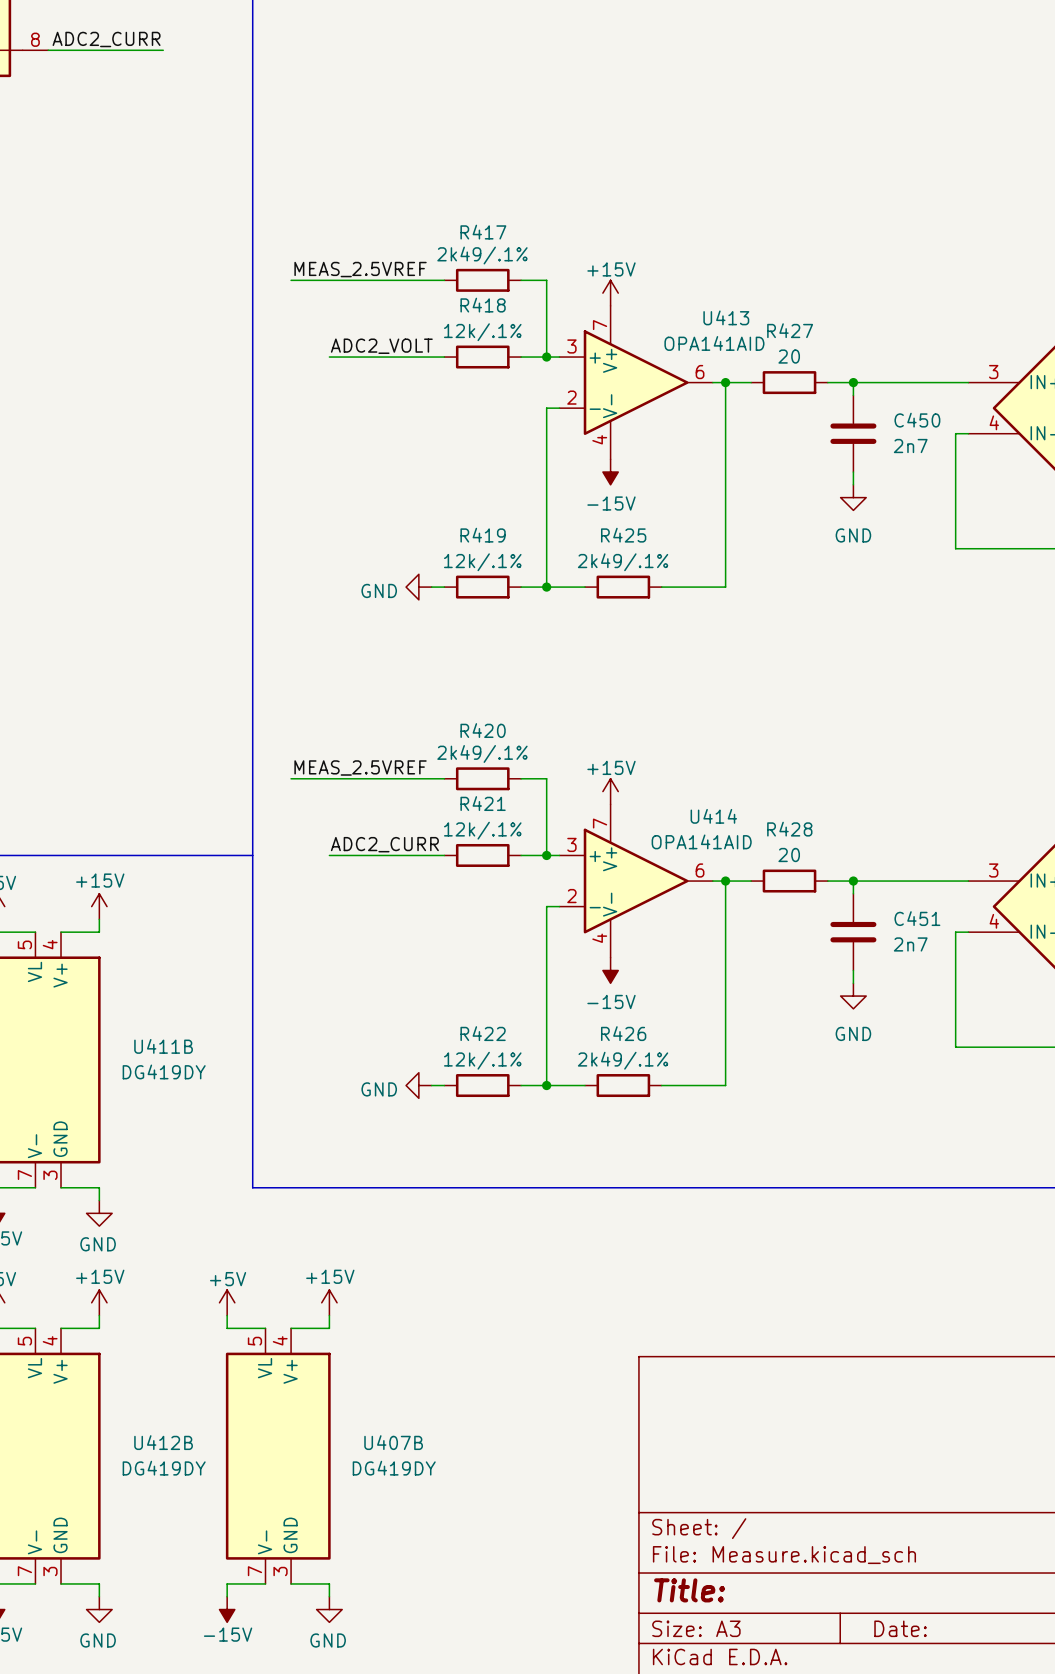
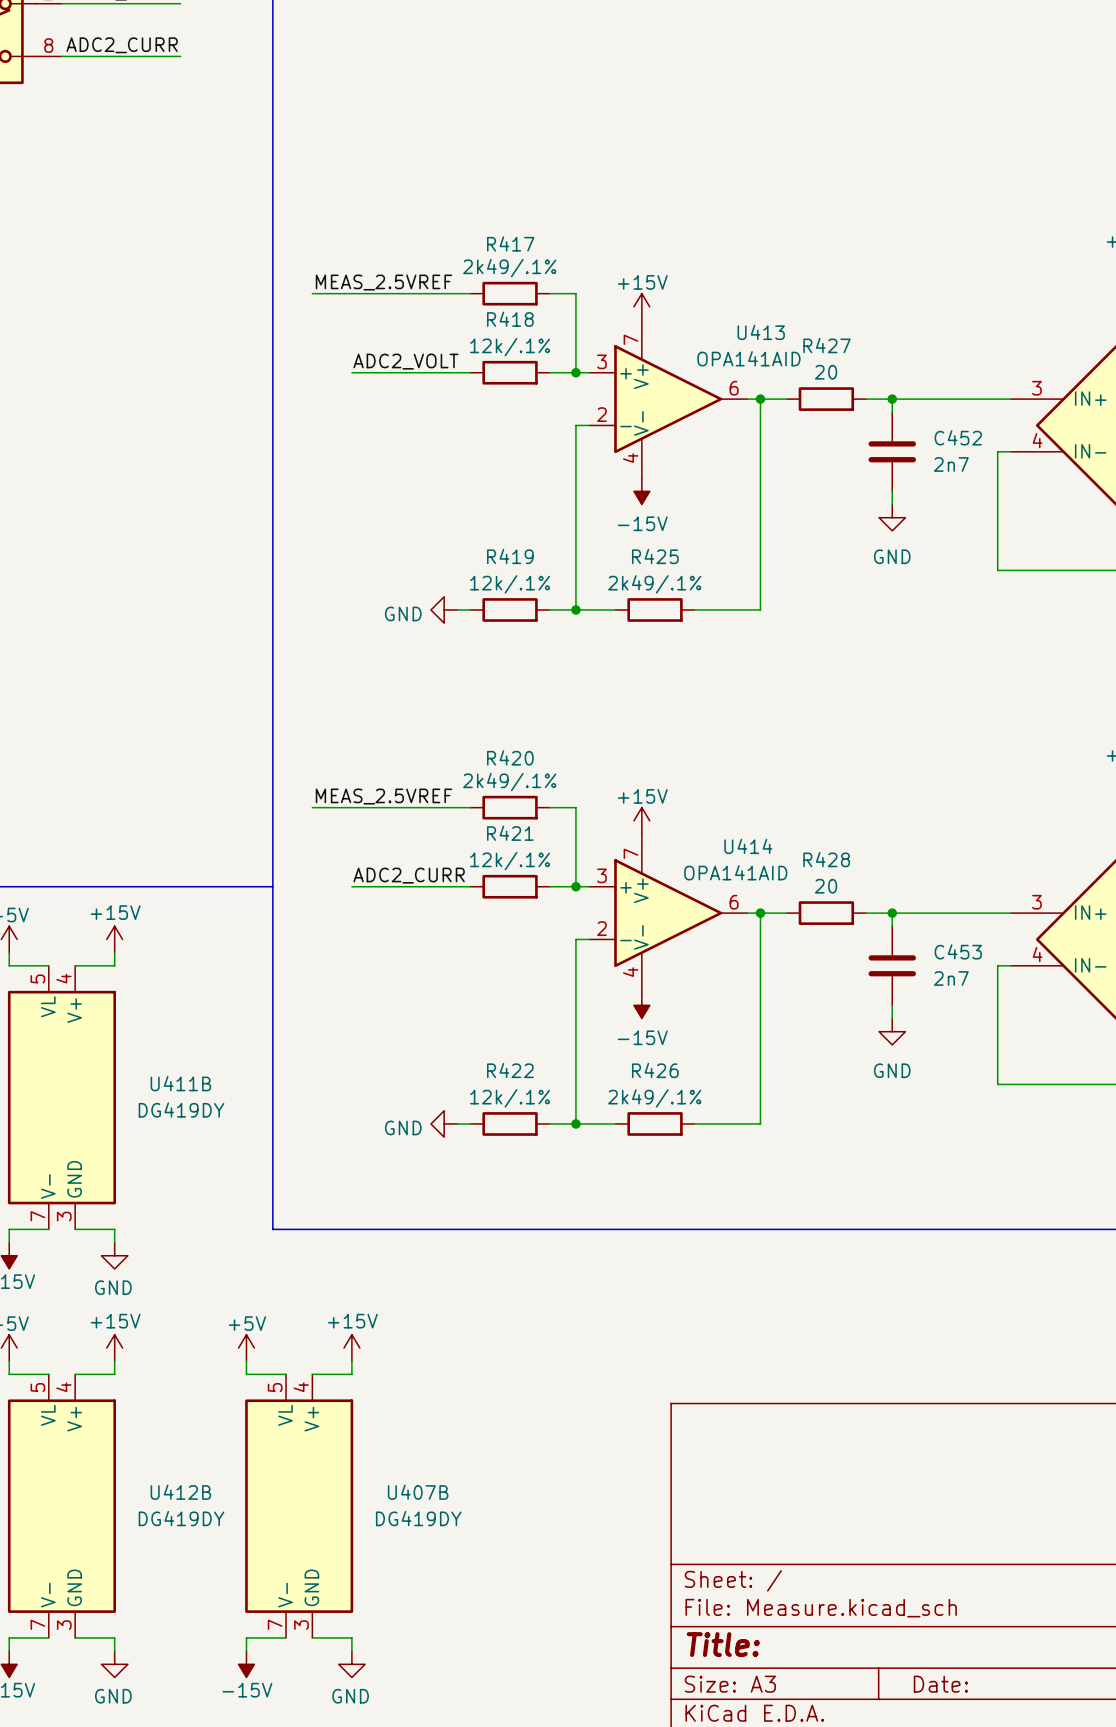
C450 name: C450 (917, 420) -> C452 (958, 437)
C451 name: C451 (917, 918) -> C453 (958, 951)

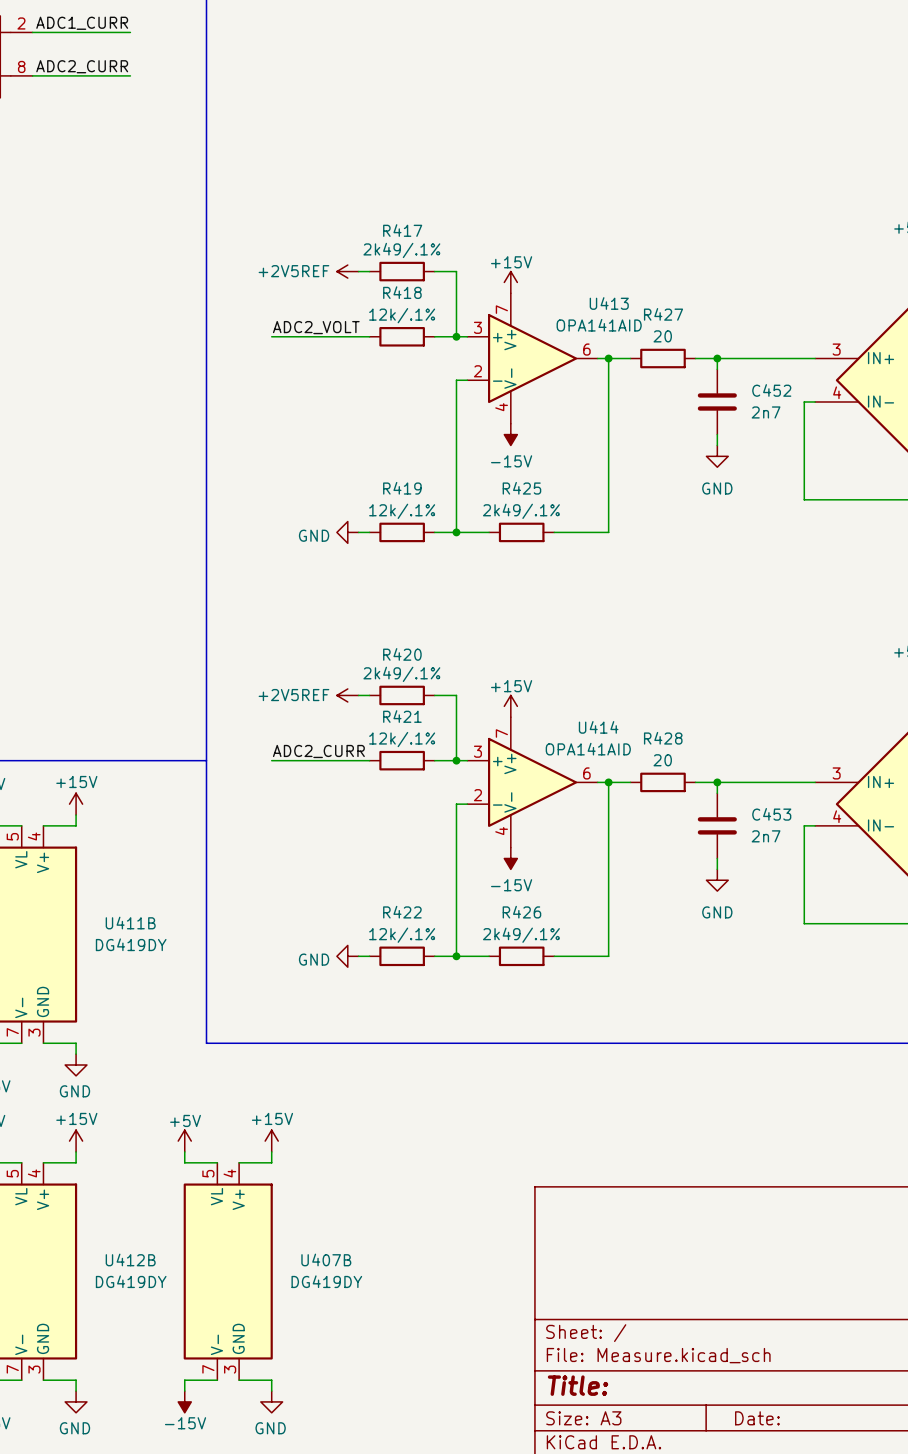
label: MEAS_2.5VREF (384, 282) -> none
wire: (312, 293) (457, 293) -> none
power symbol: none -> +2V5REF (347, 271)
label: MEAS_2.5VREF (384, 796) -> none
wire: (312, 807) (457, 807) -> none
power symbol: none -> +2V5REF (347, 695)

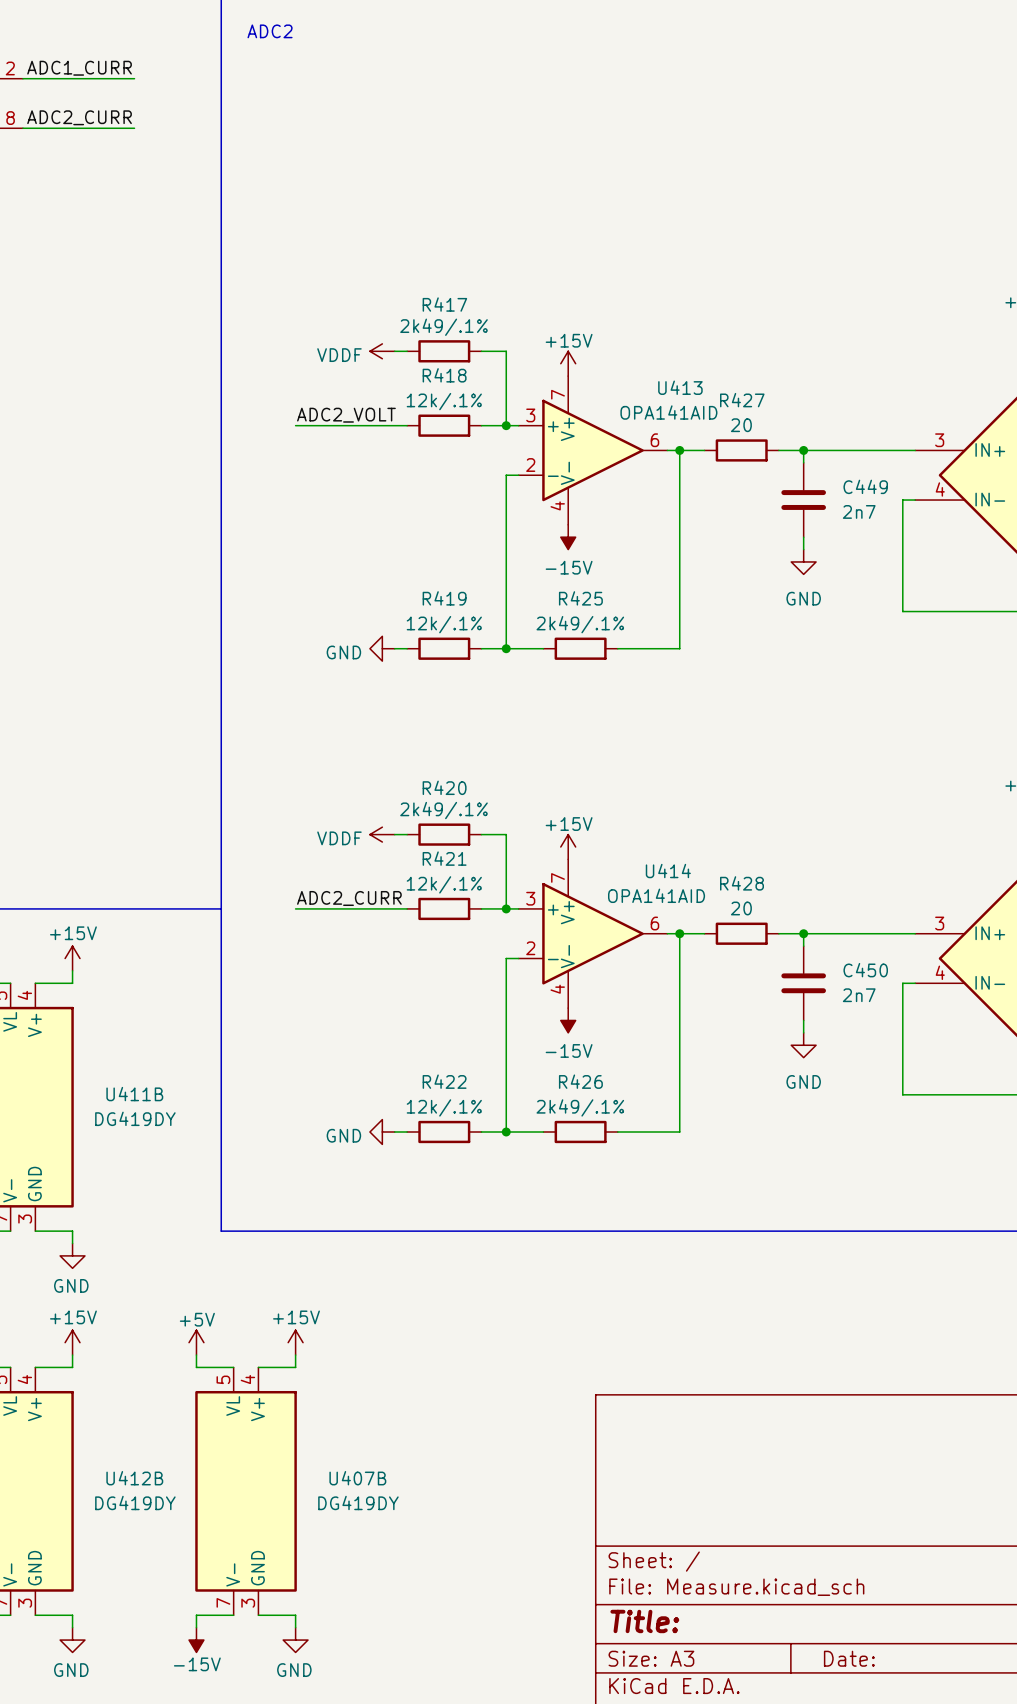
power symbol: +2V5REF (347, 271) -> VDDF (382, 351)
C452 name: C452 (771, 390) -> C449 (865, 486)
power symbol: +2V5REF (347, 695) -> VDDF (382, 834)
C453 name: C453 (771, 814) -> C450 (865, 970)

